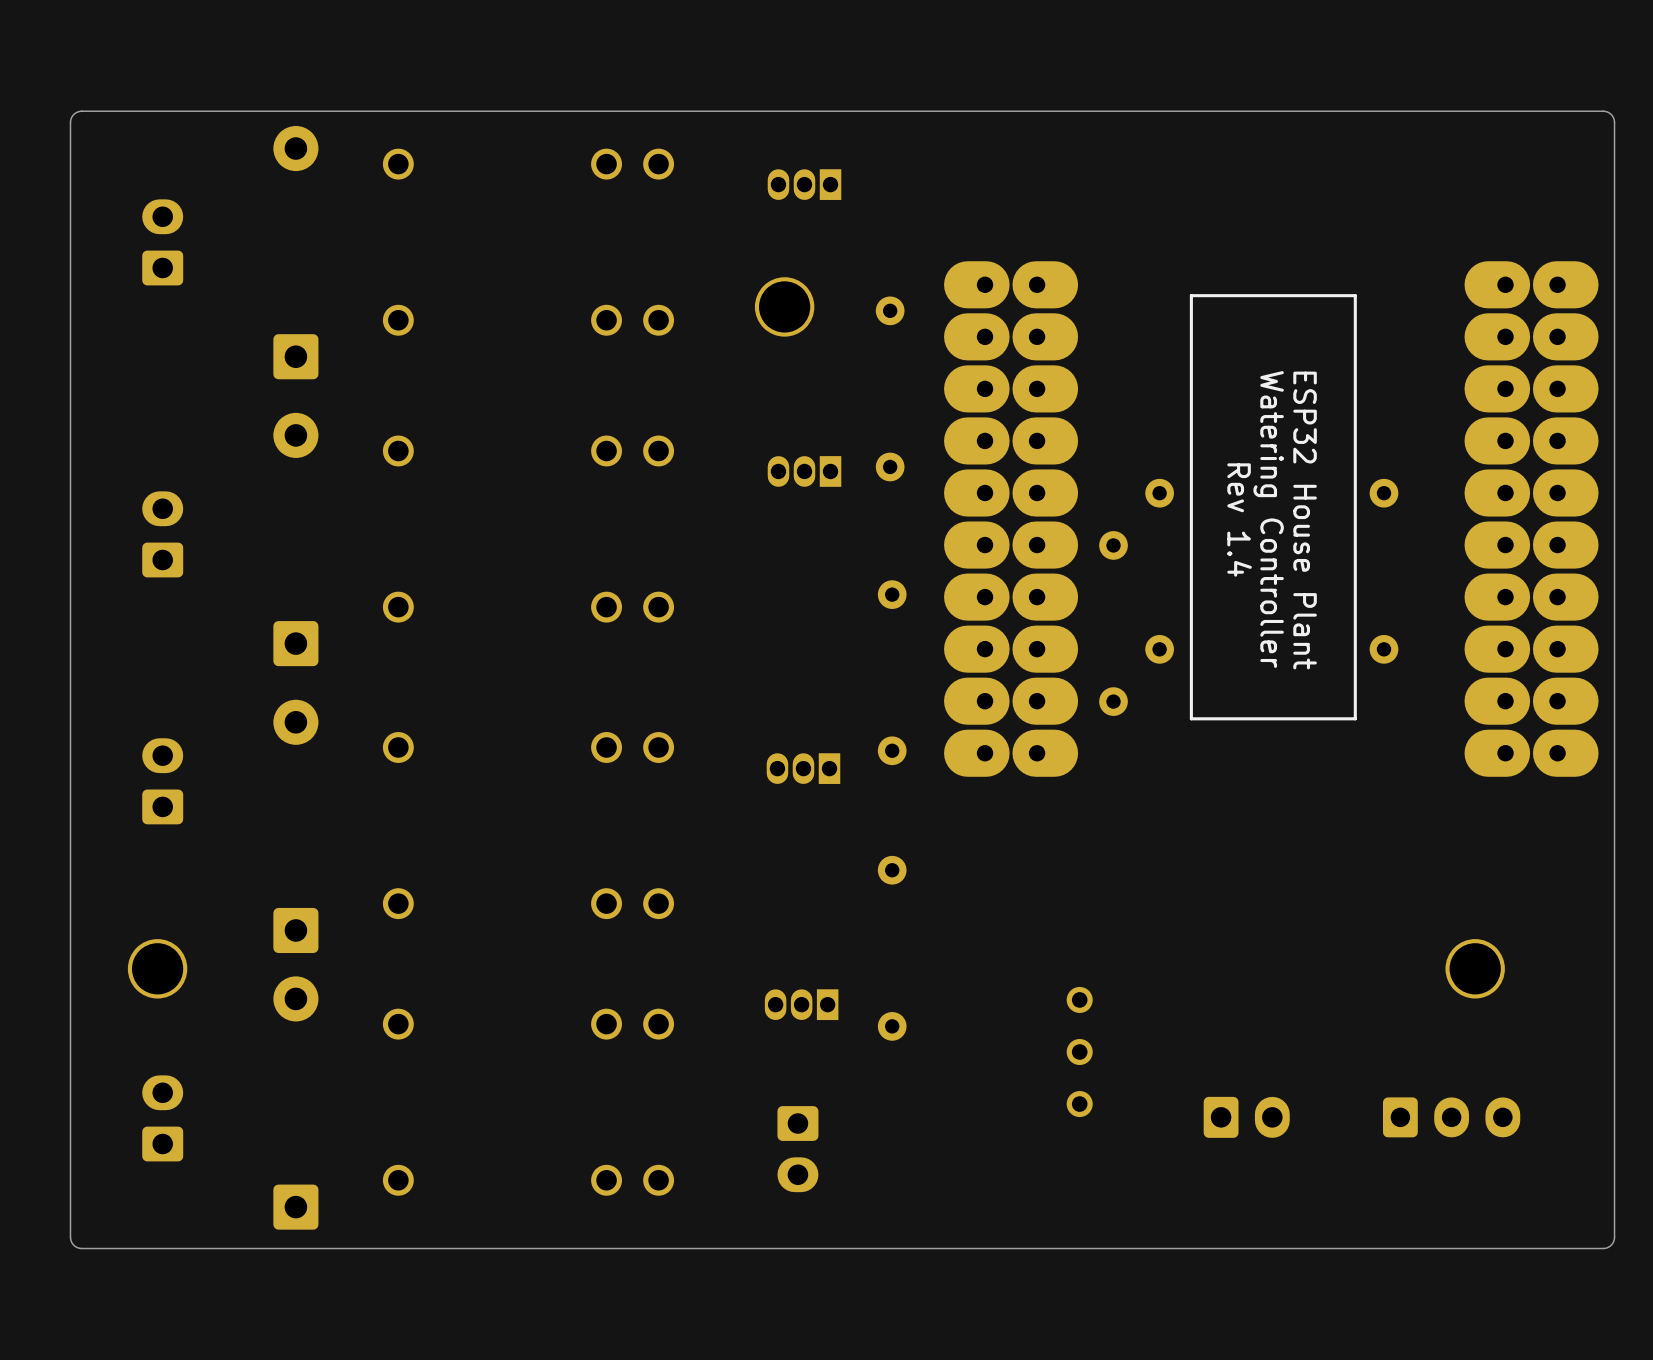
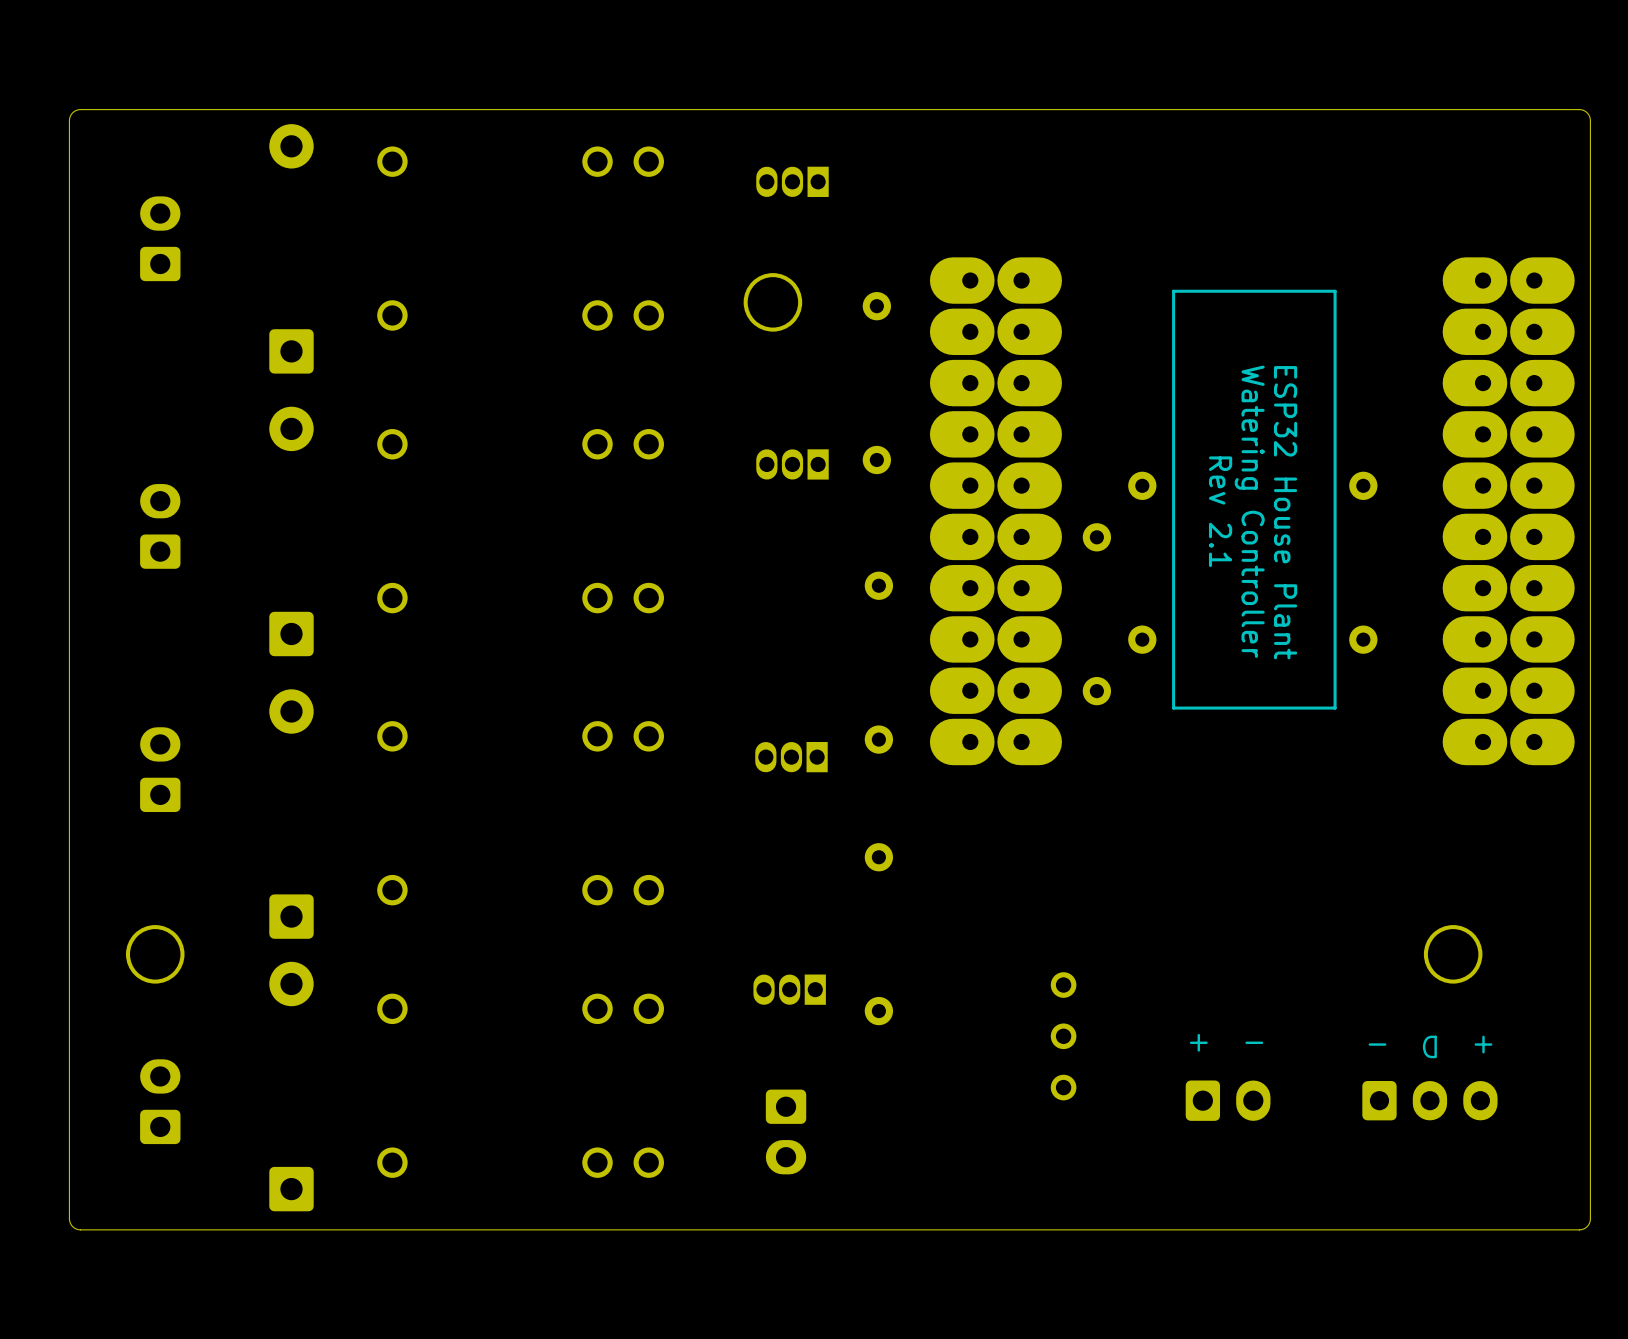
text: Rev 1.4 (1239, 519) -> Rev 2.1 (1220, 511)
text: none -> + (1198, 1042)
text: none -> - (1254, 1042)
text: none -> - (1377, 1044)
text: none -> + (1483, 1044)
text: none -> D (1429, 1046)

